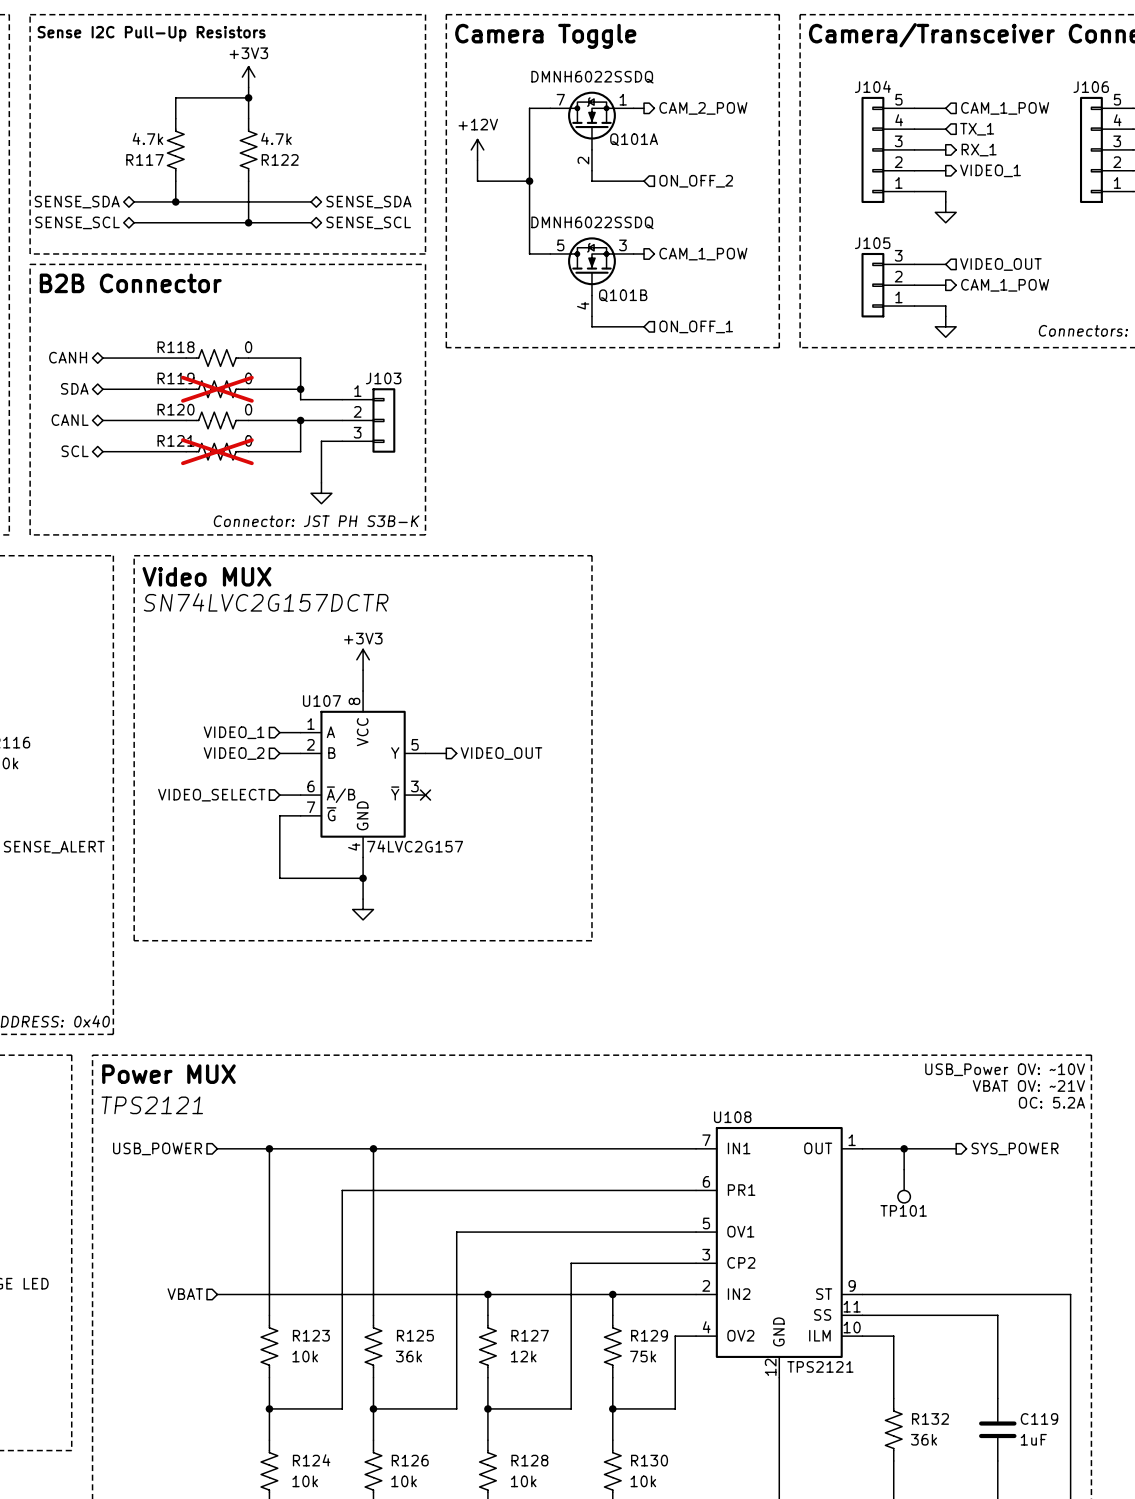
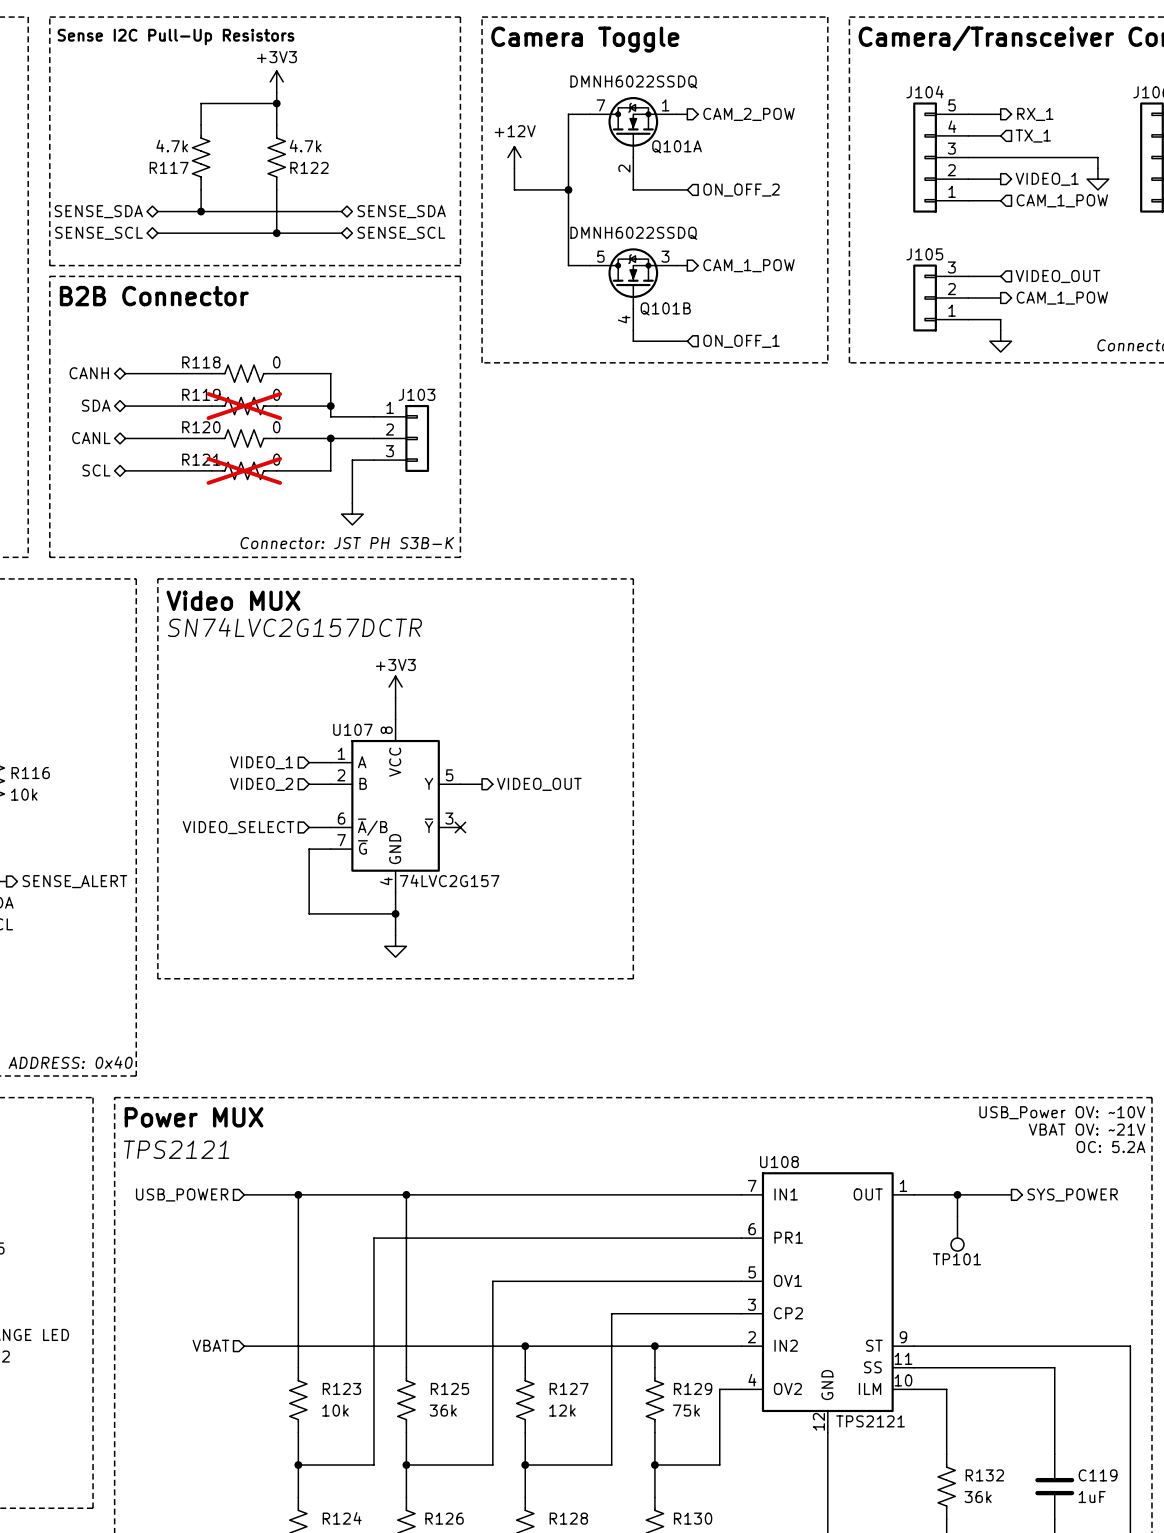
hierarchical label shape: input (1005, 108) -> output (1035, 114)
hierarchical label: CAM_1_POW (1005, 108) -> RX_1 (1035, 114)
wire: none -> (1000, 157) (1097, 157) (1097, 168)
hierarchical label: RX_1 (979, 150) -> none
wire: (945, 191) (945, 201) -> none
hierarchical label: none -> CAM_1_POW (1062, 200)
power symbol position: (945, 212) -> (1097, 179)

